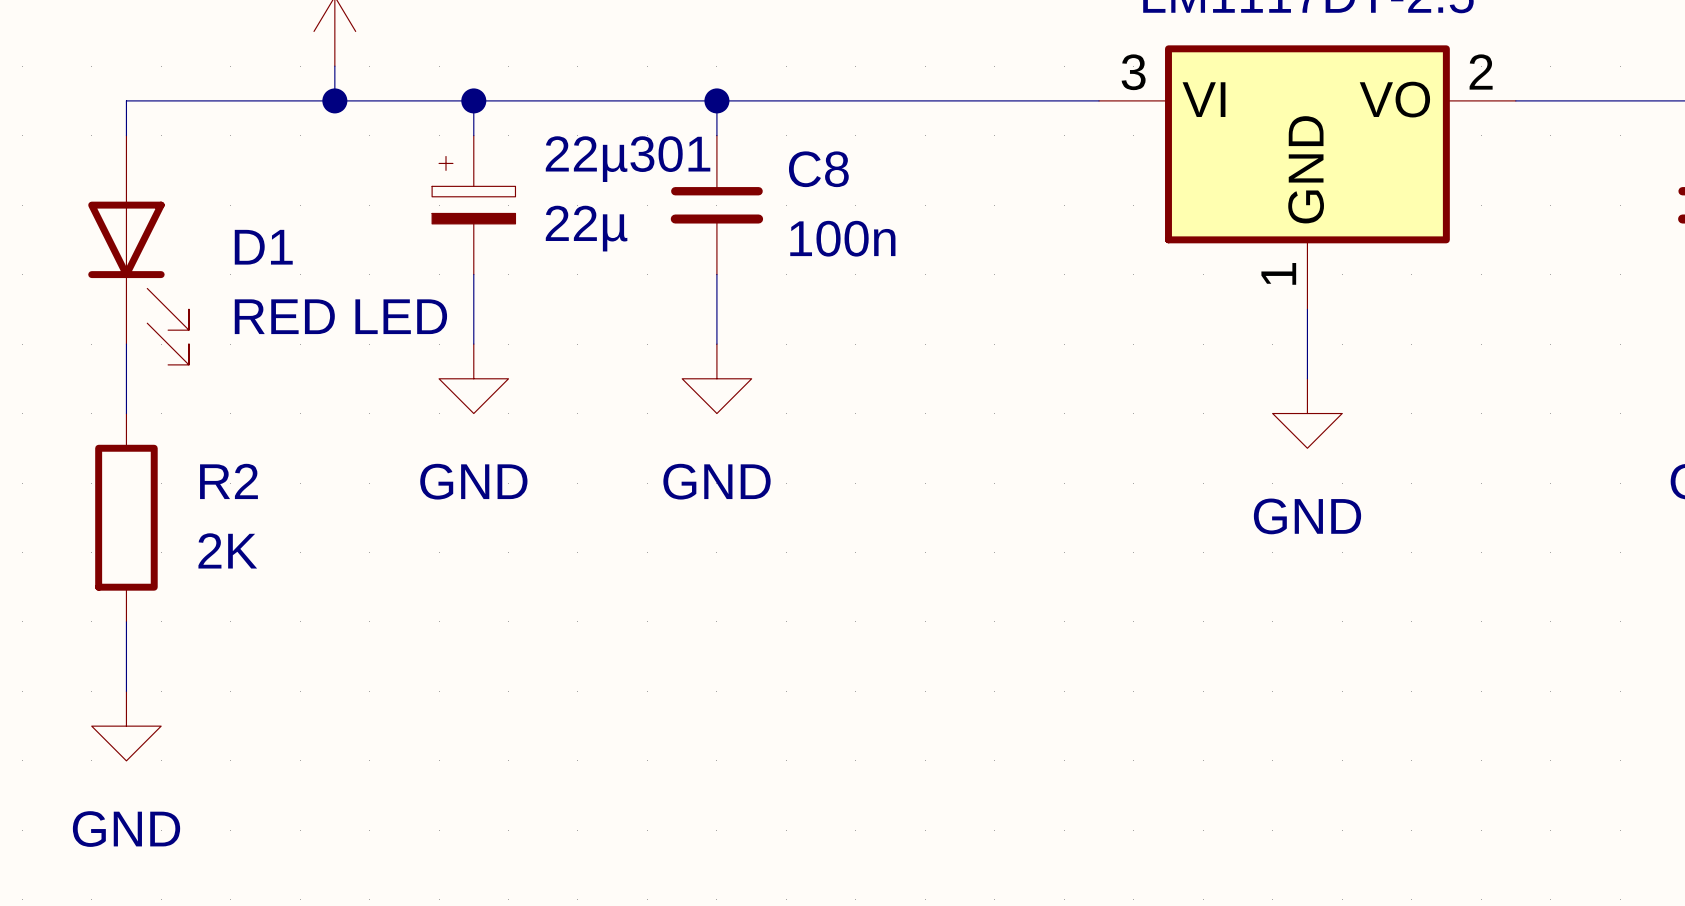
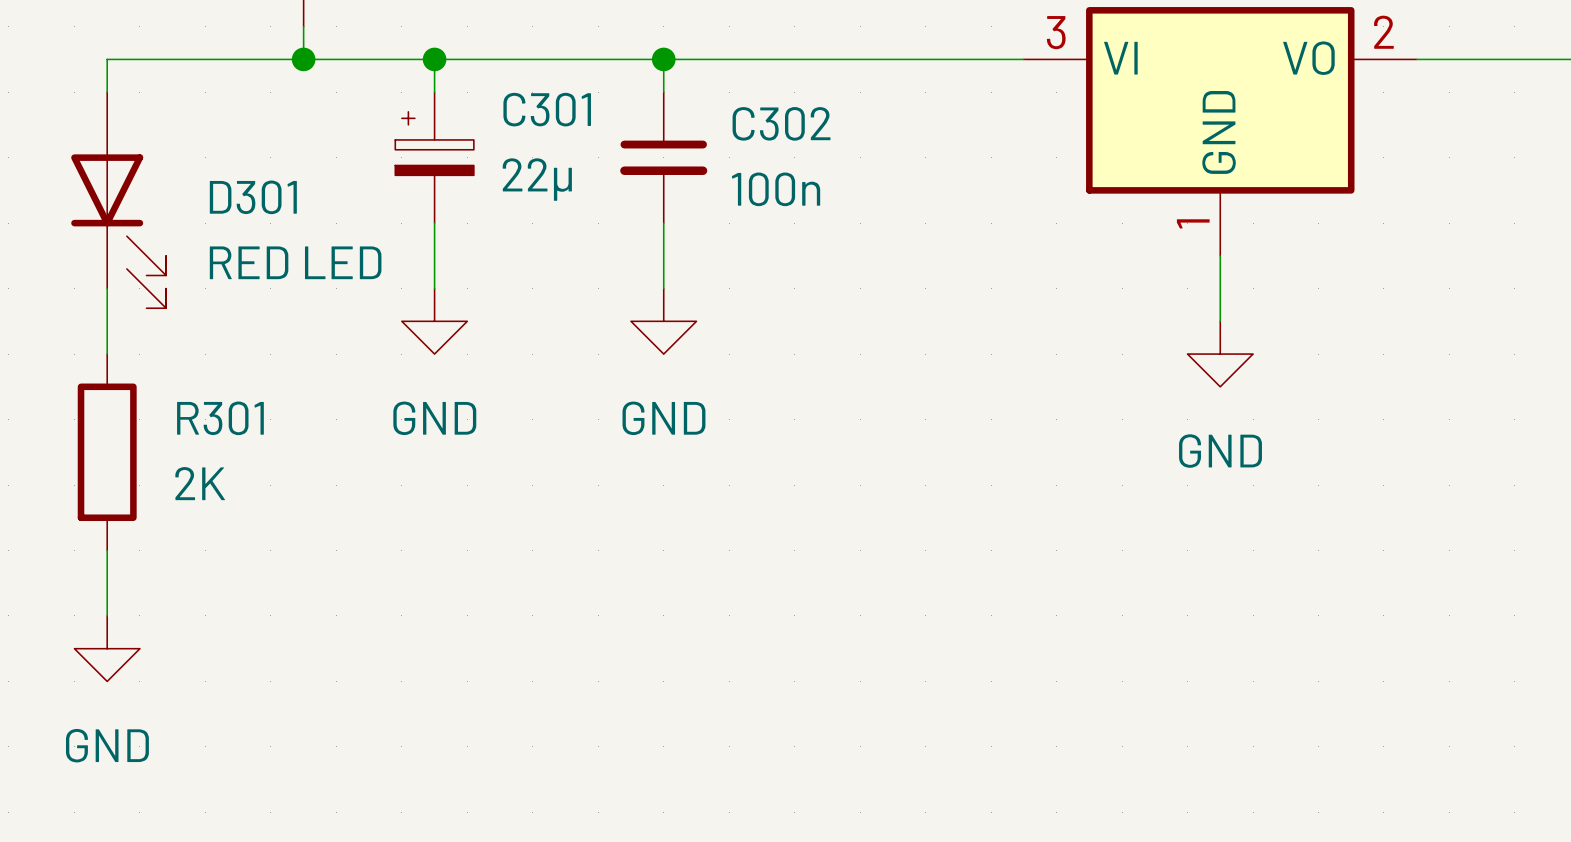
22µ301 name: 22µ301 (628, 159) -> C301 (547, 109)
C8 name: C8 (818, 169) -> C302 (781, 123)
D1 name: D1 (263, 247) -> D301 (253, 197)
R2 name: R2 (228, 481) -> R301 (220, 418)

